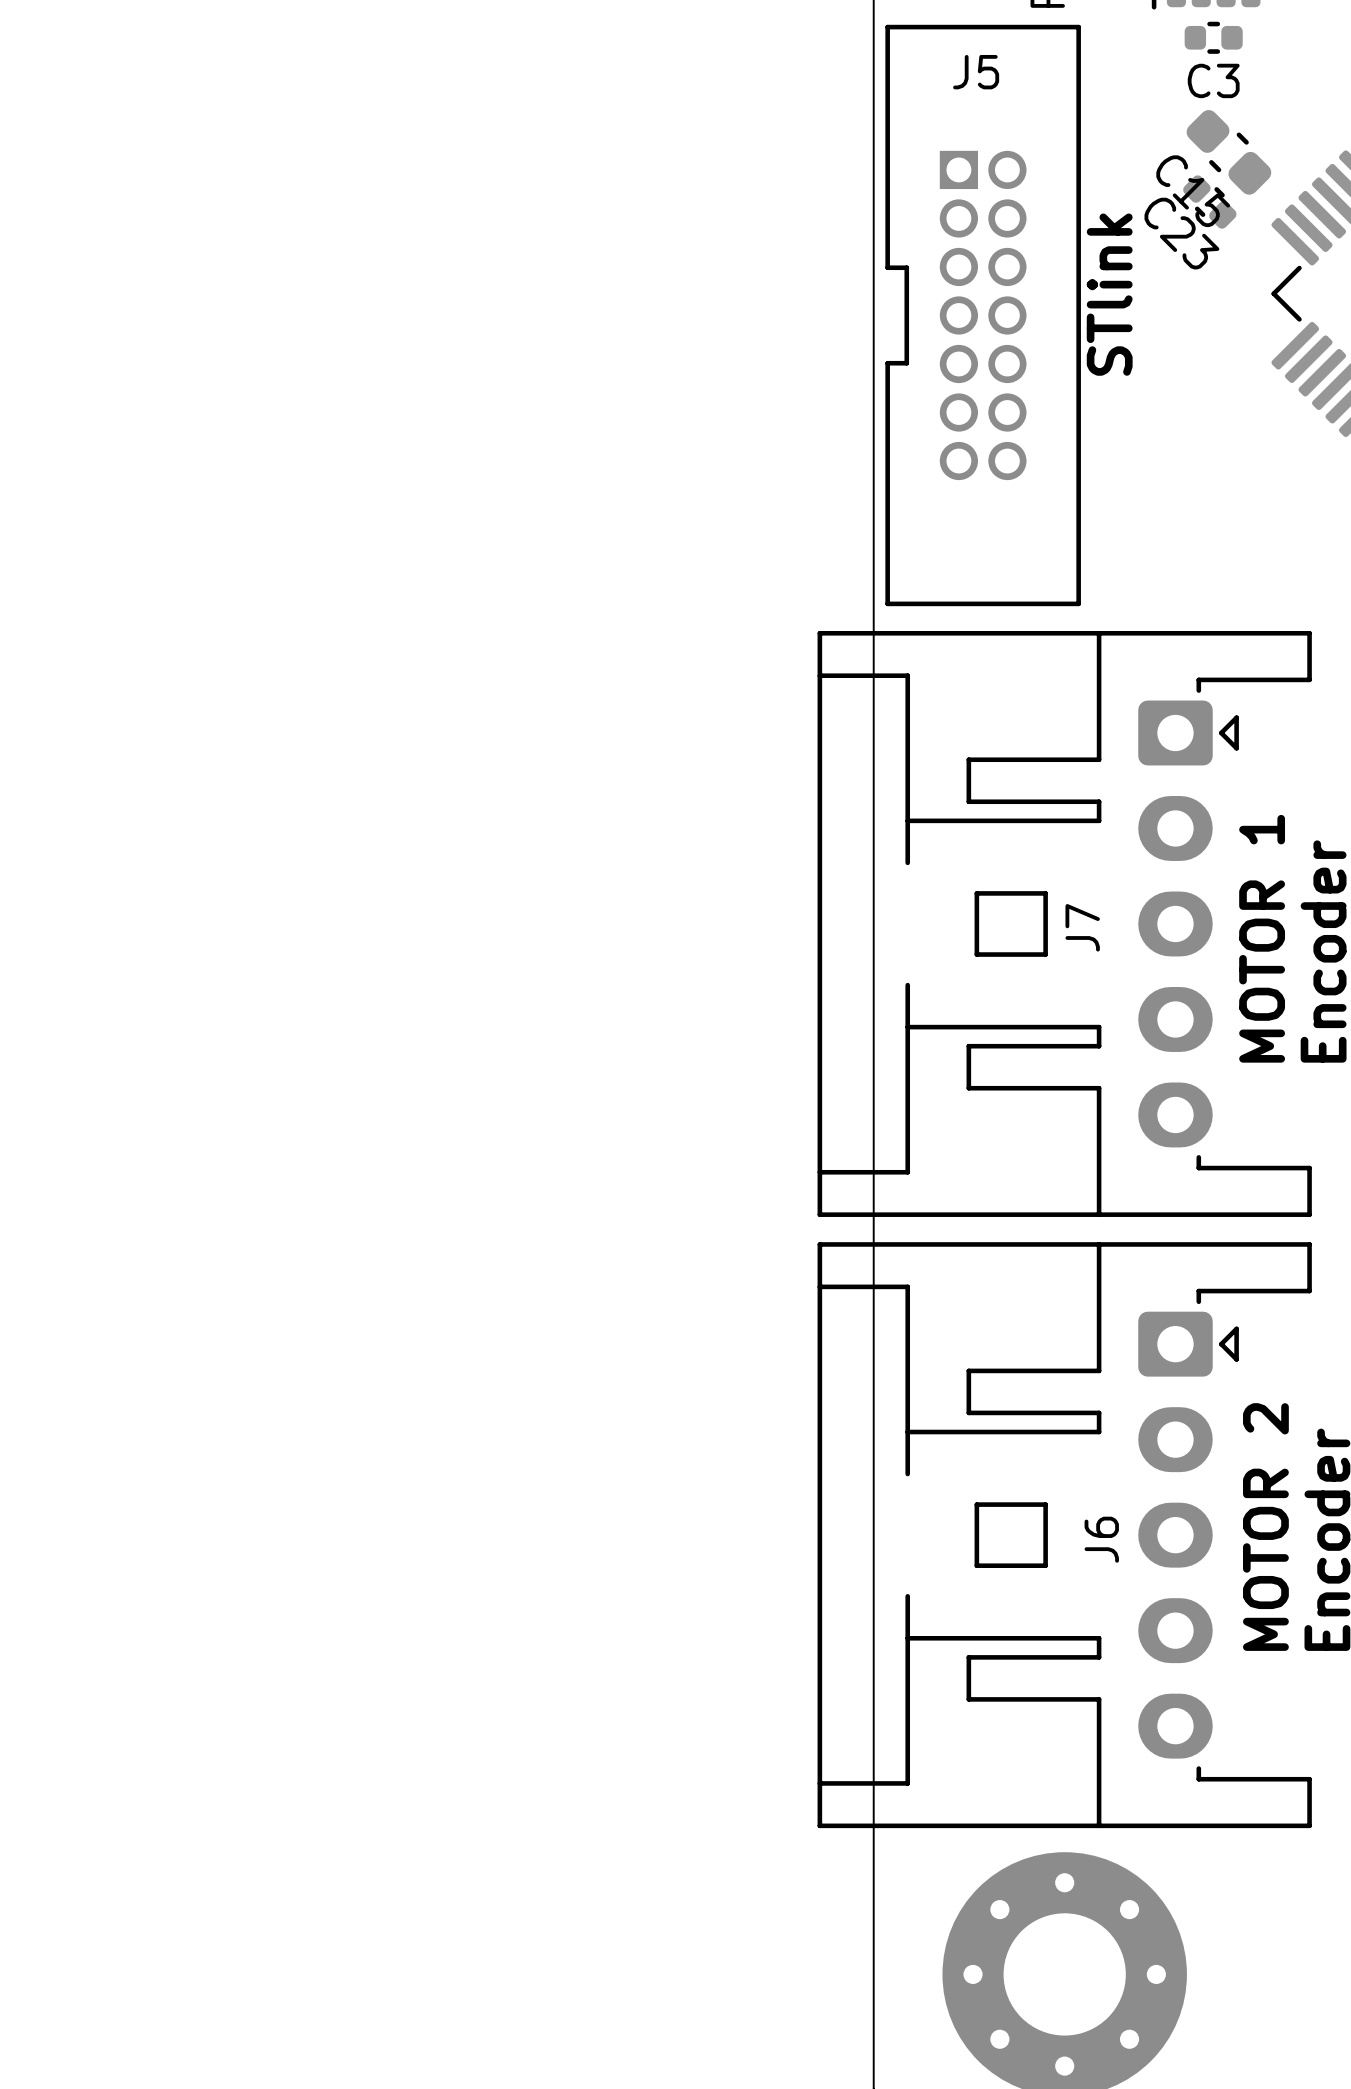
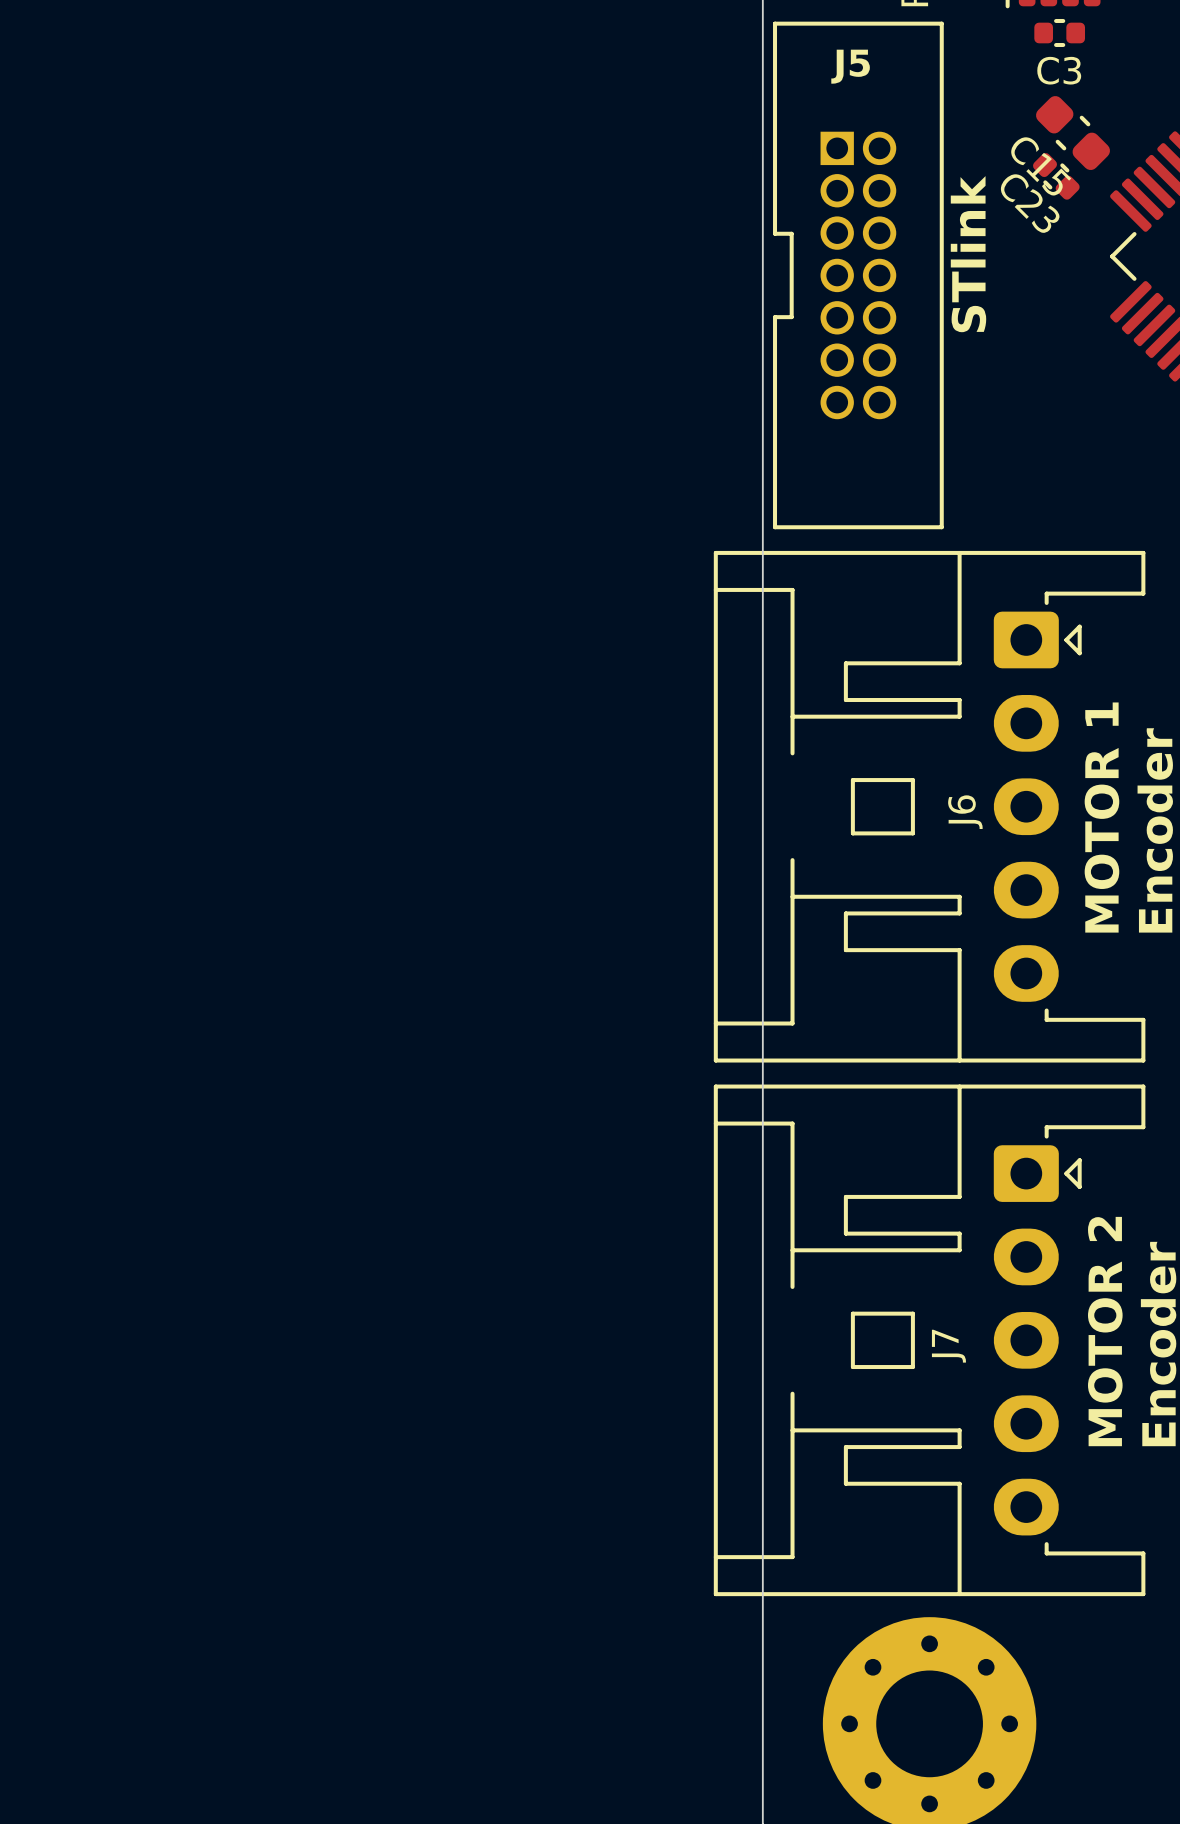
J7 name: J7 (1082, 927) -> J6 (965, 812)
J6 name: J6 (1101, 1539) -> J7 (948, 1346)

